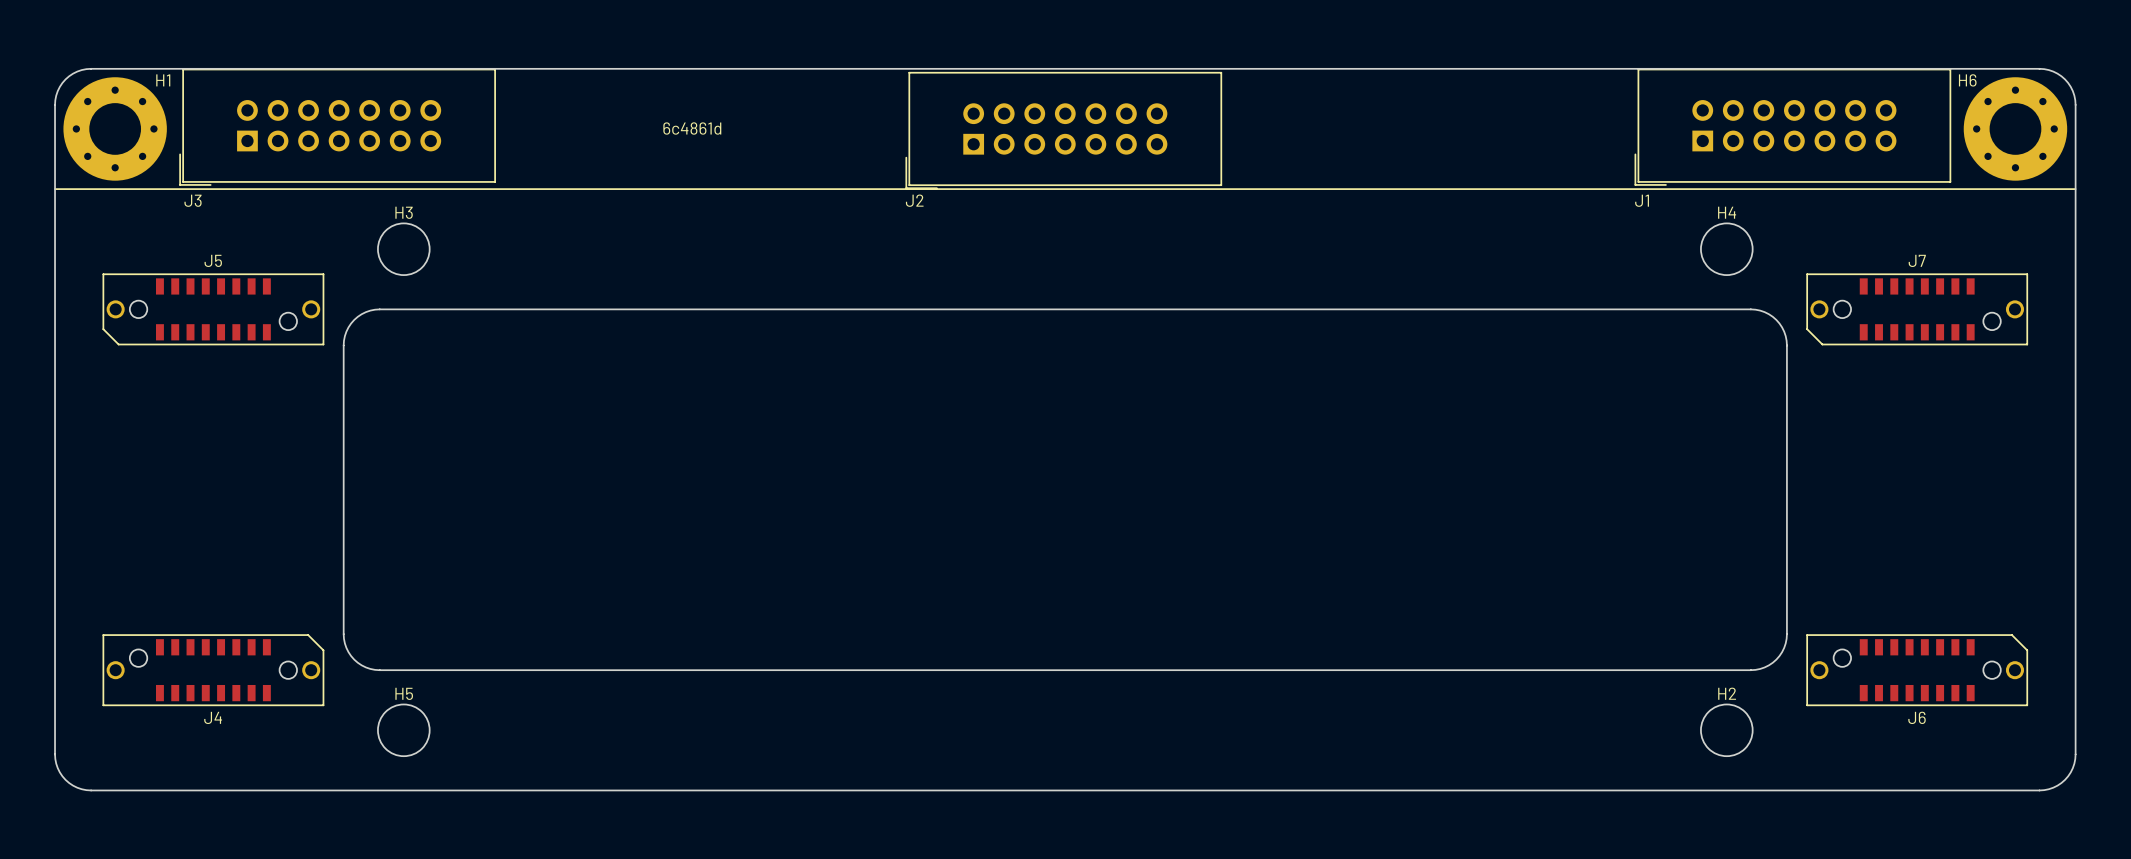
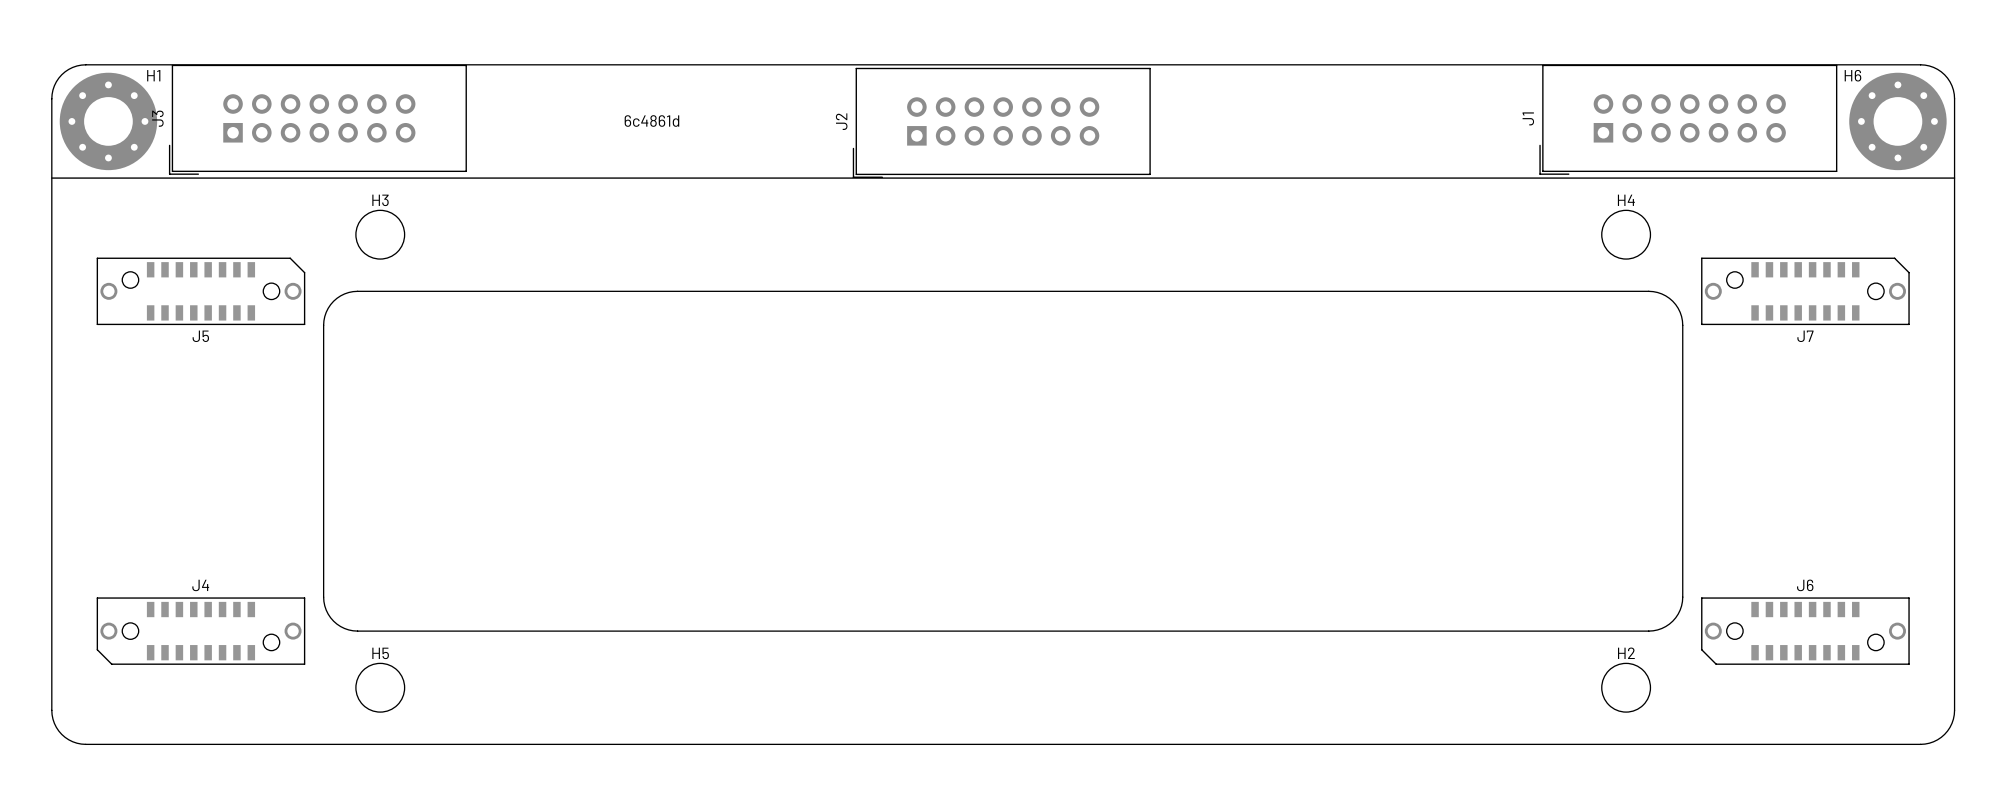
J3 name rotation: 0° (193, 200) -> 90° counterclockwise (157, 118)
J3 name position: J3 (193, 200) -> J3 (157, 118)
J2 name rotation: 0° (914, 200) -> 90° counterclockwise (841, 121)
J2 name position: J2 (914, 200) -> J2 (841, 121)
J1 name rotation: 0° (1642, 200) -> 90° counterclockwise (1528, 118)
J1 name position: J1 (1642, 200) -> J1 (1528, 118)
J5 rotation: 0° (213, 309) -> 180° (200, 291)
J7 rotation: 0° (1917, 309) -> 180° (1805, 291)
J4 rotation: 0° (213, 670) -> 180° (200, 631)
J6 rotation: 0° (1917, 670) -> 180° (1805, 631)

